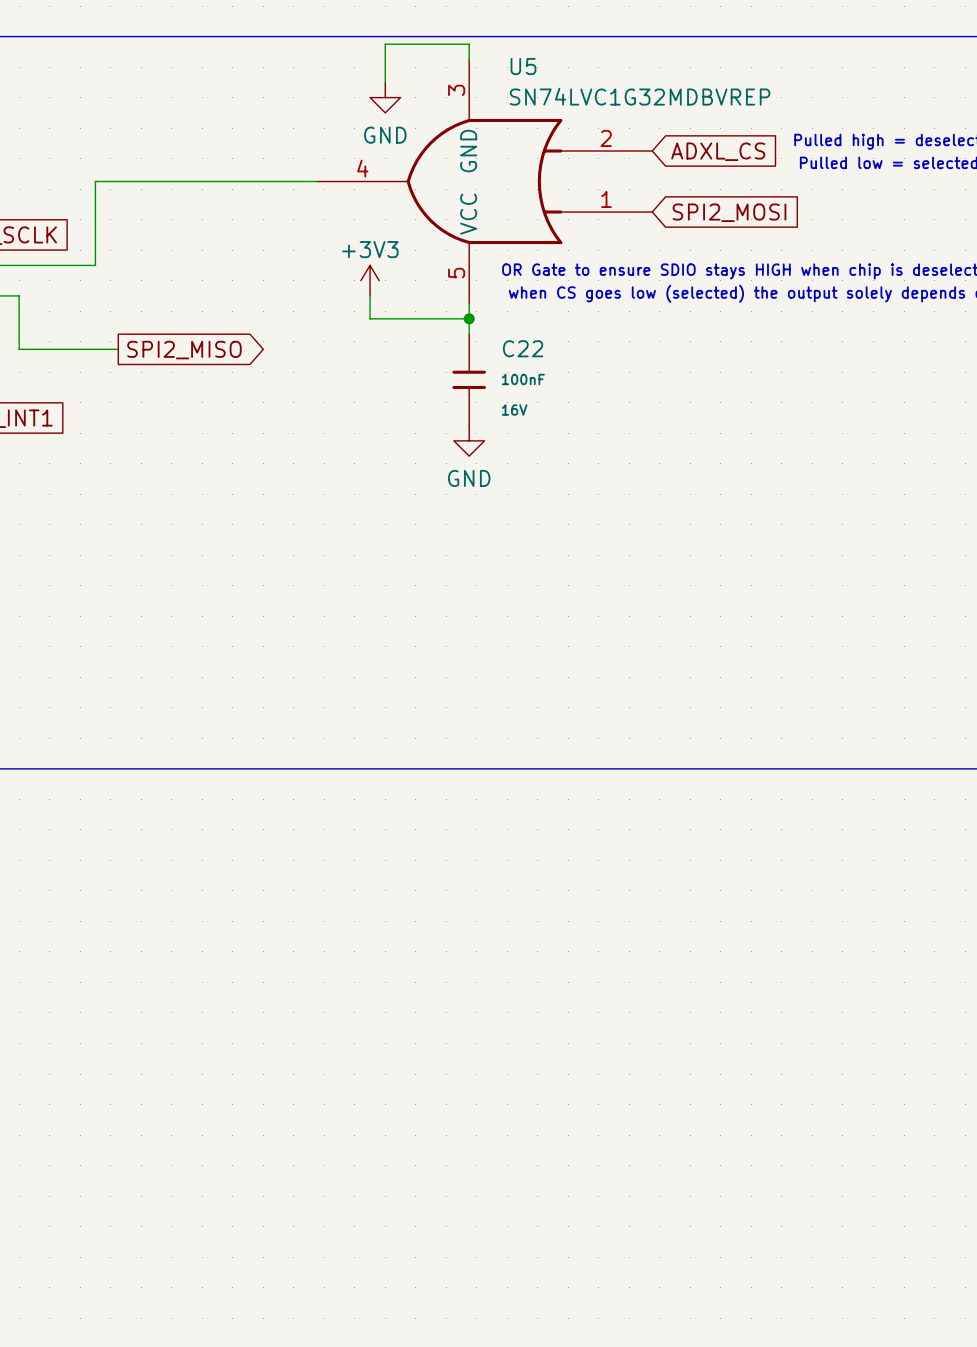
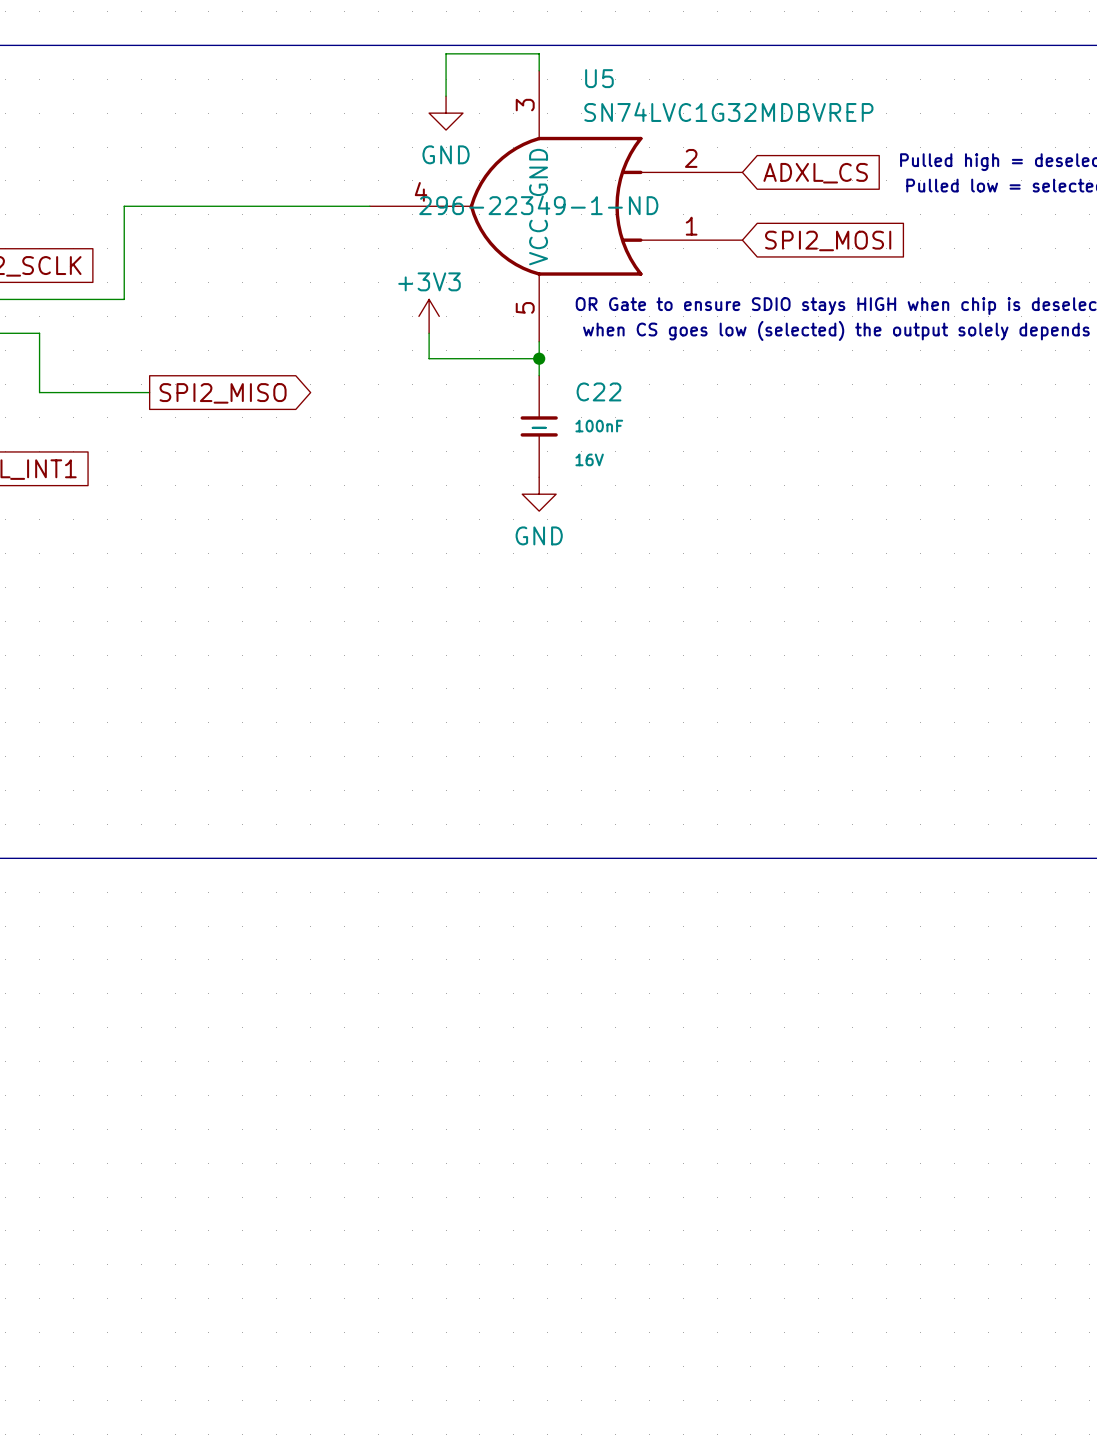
U5 text: none -> 296-22349-1-ND (538, 205)
C22 text: none -> - (539, 427)
C22 text: none -> - (539, 427)

